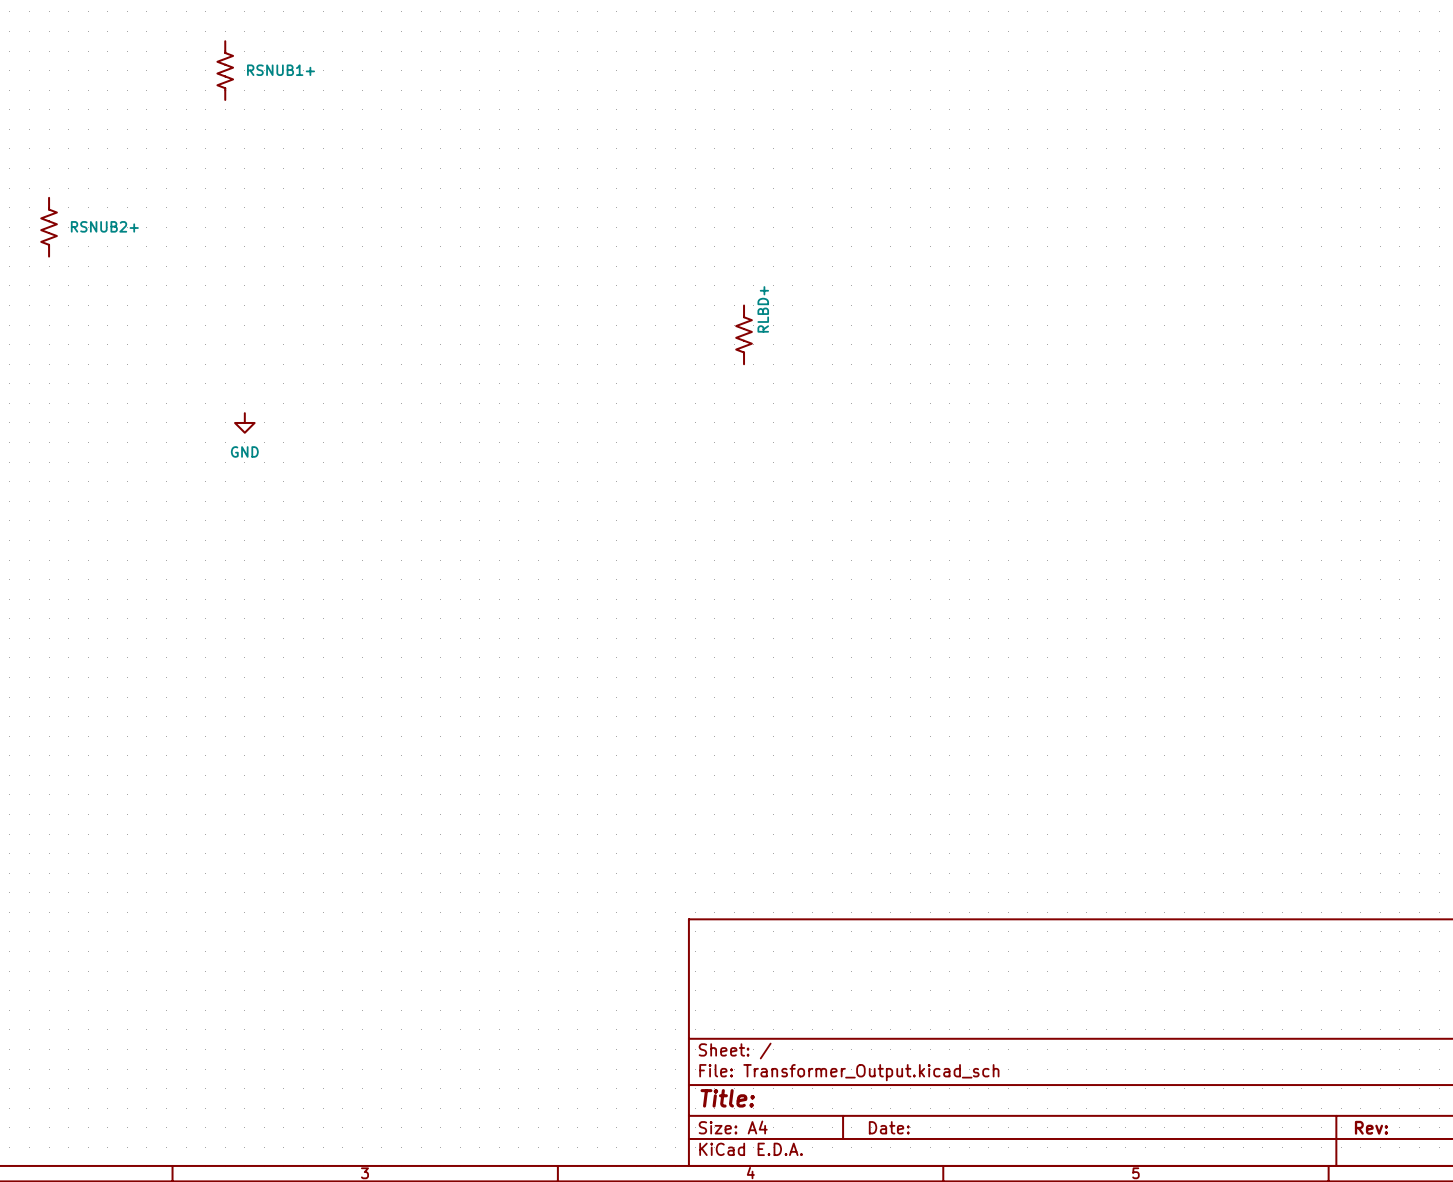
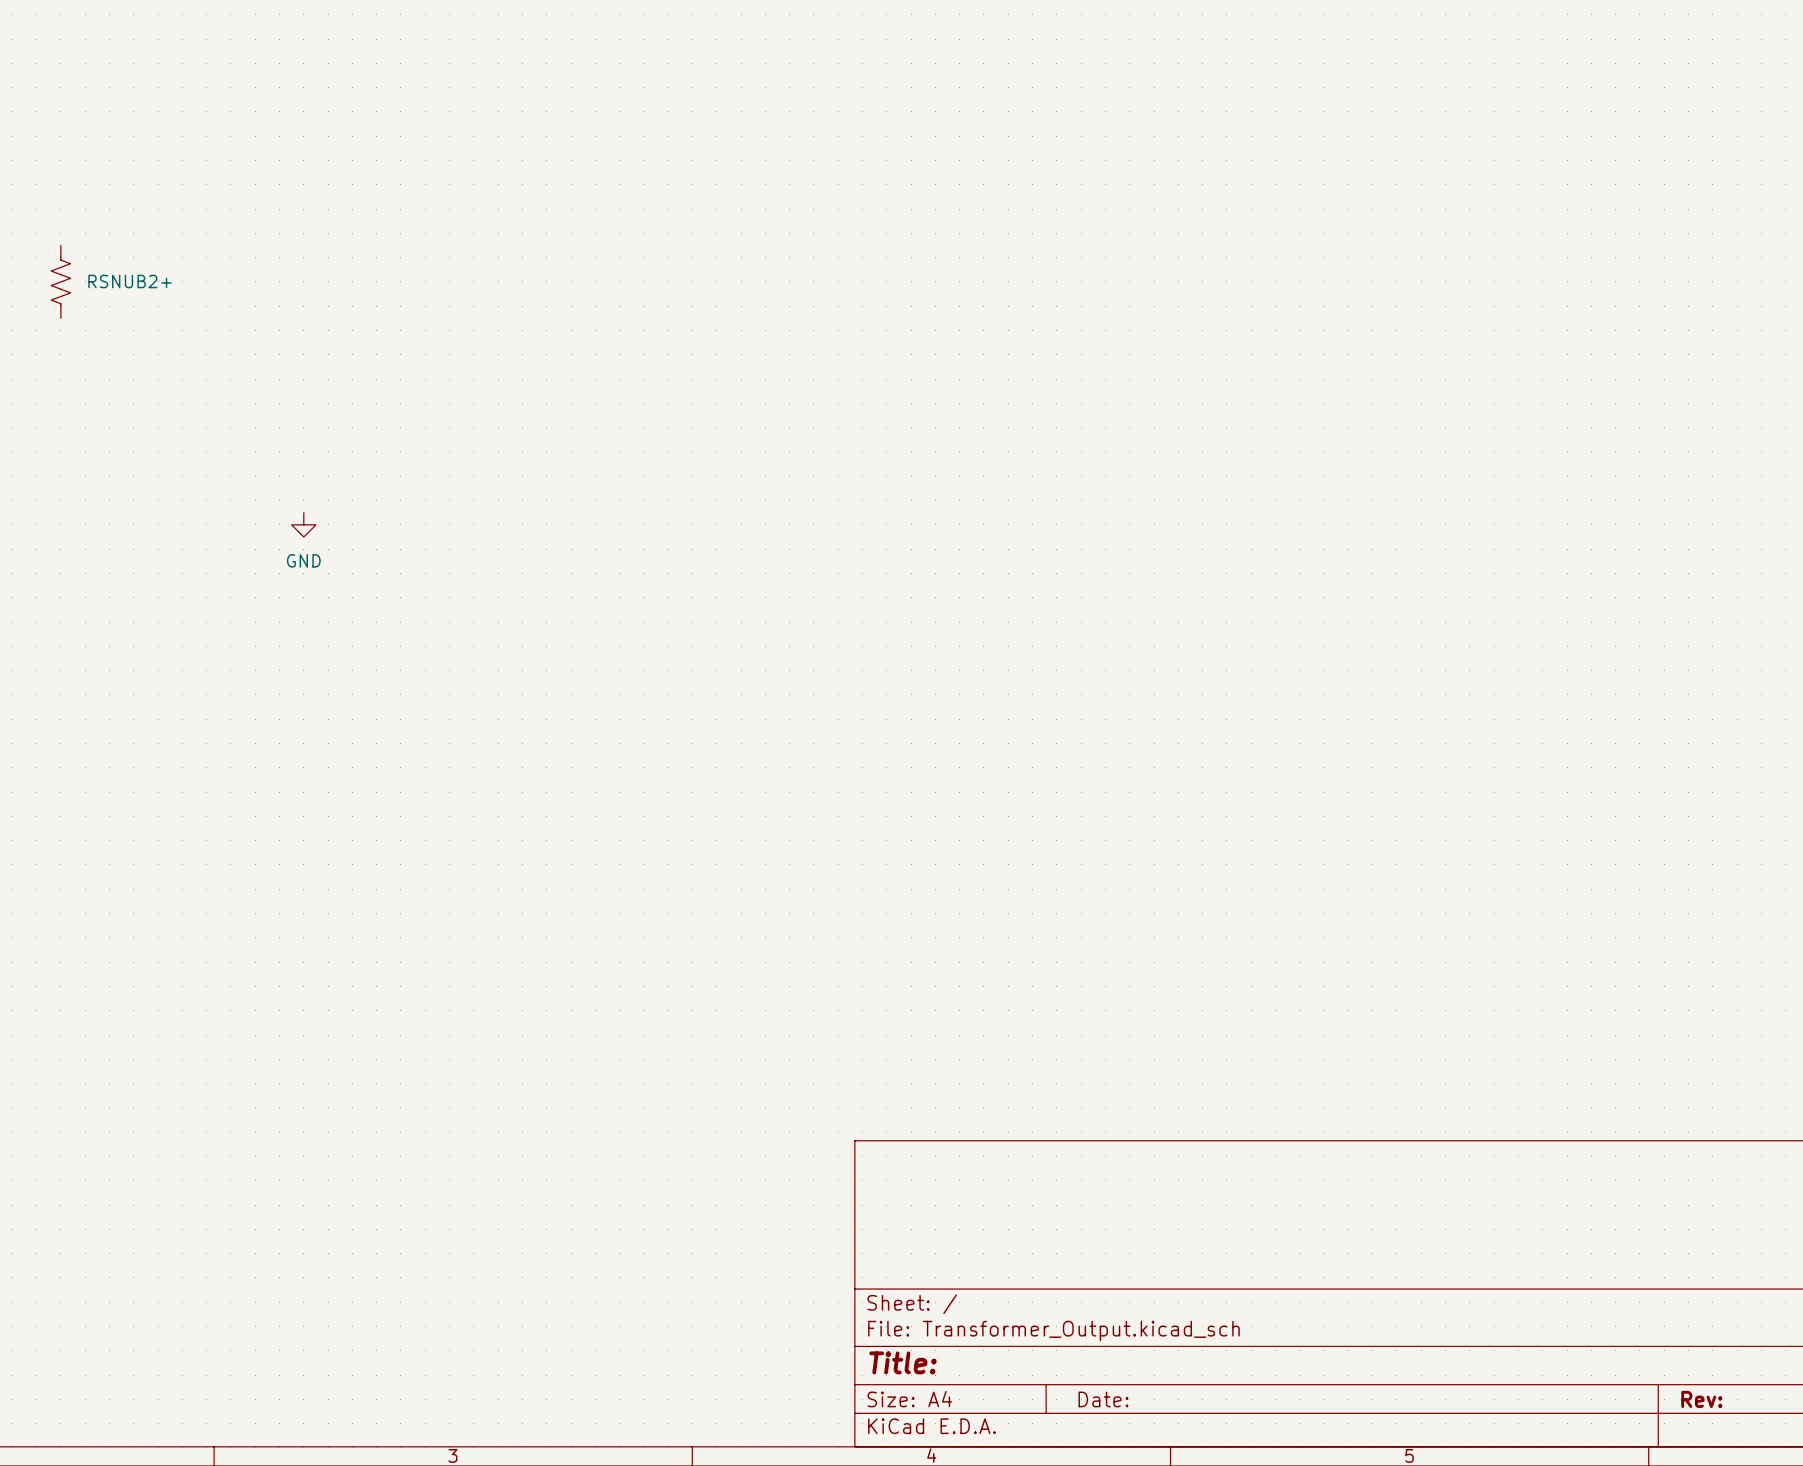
part: RSNUB1+ (225, 70) -> none
part: RLBD+ (744, 334) -> none

